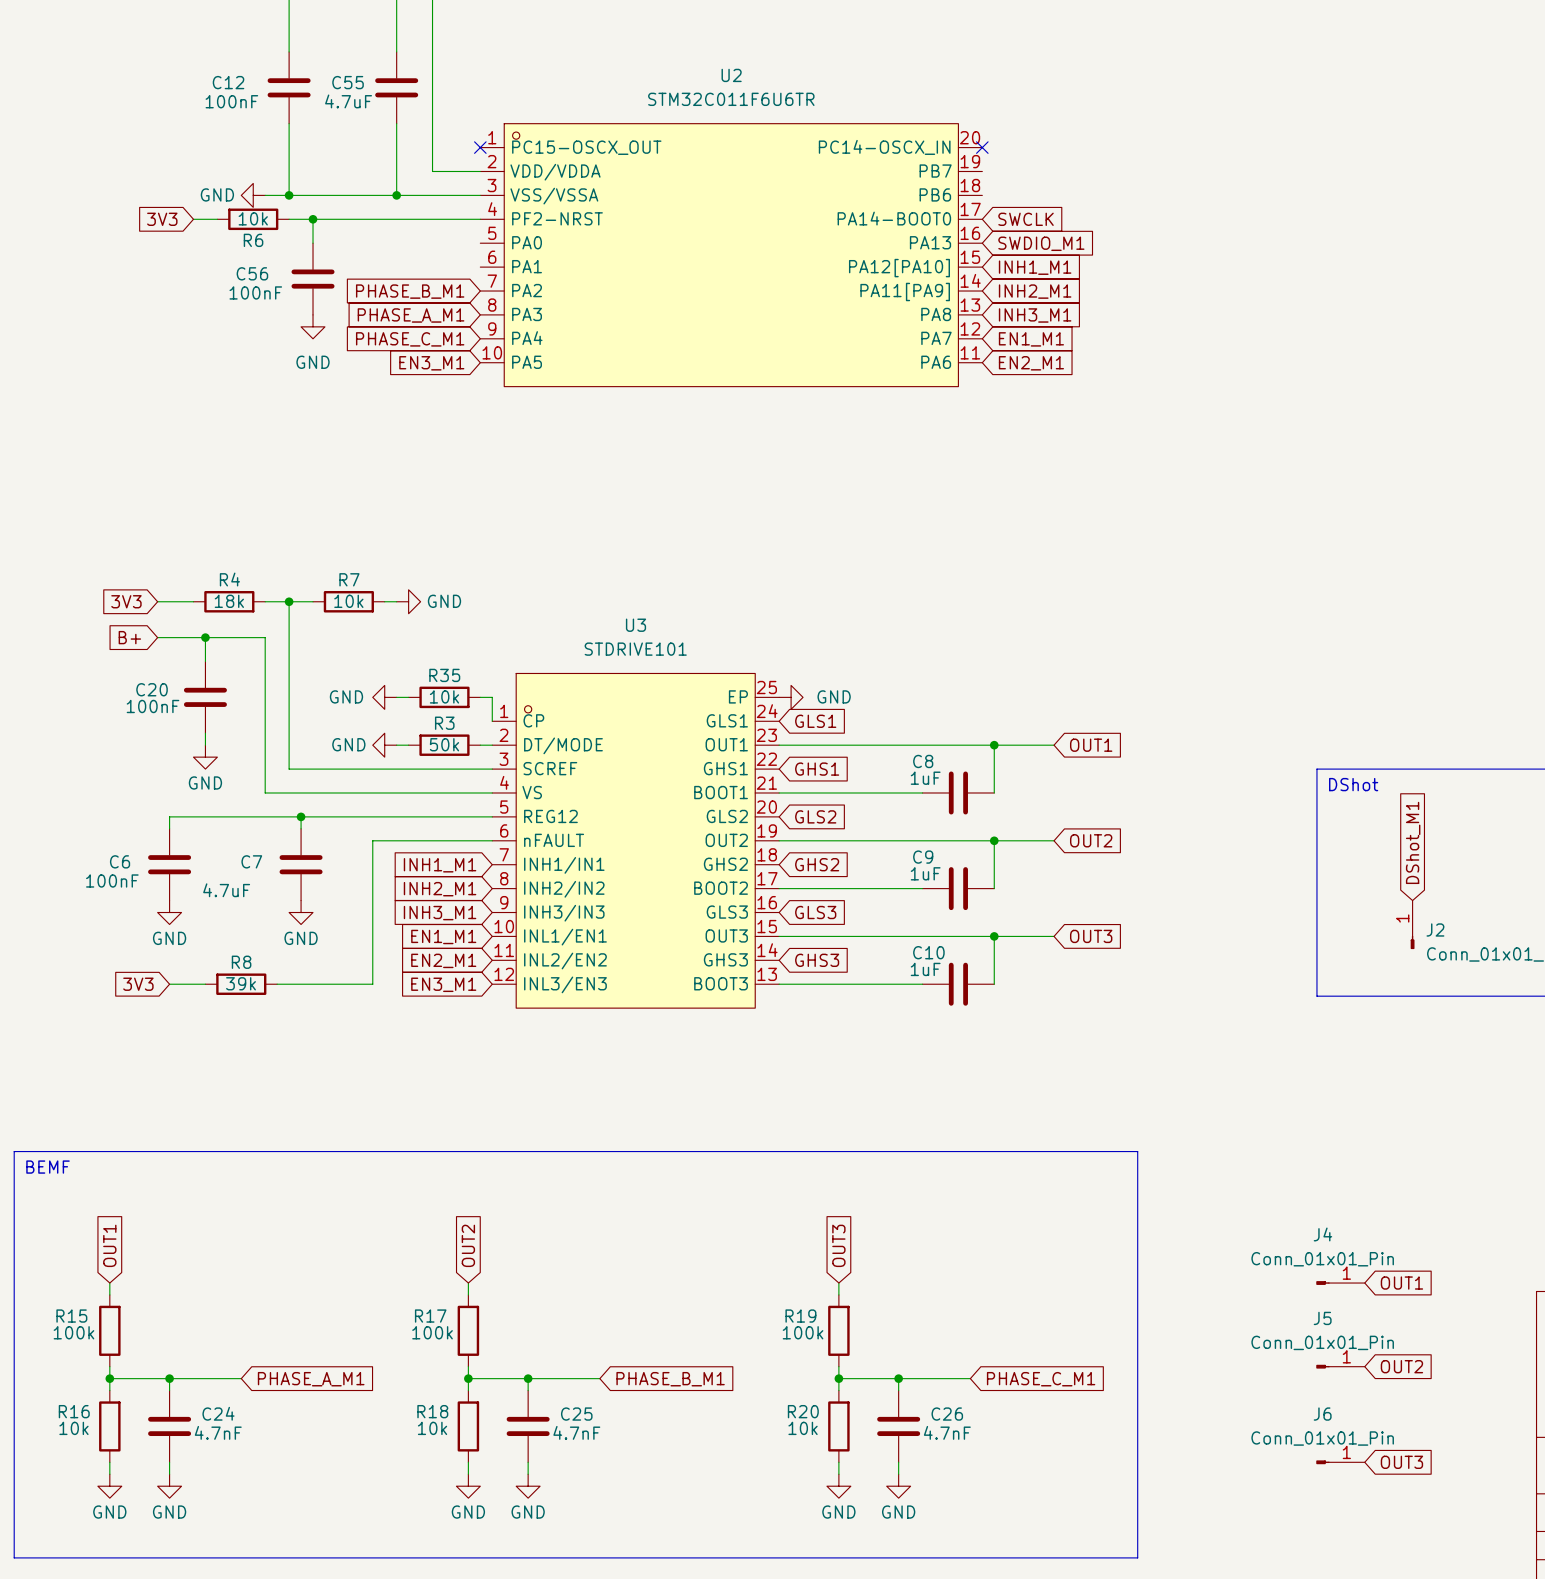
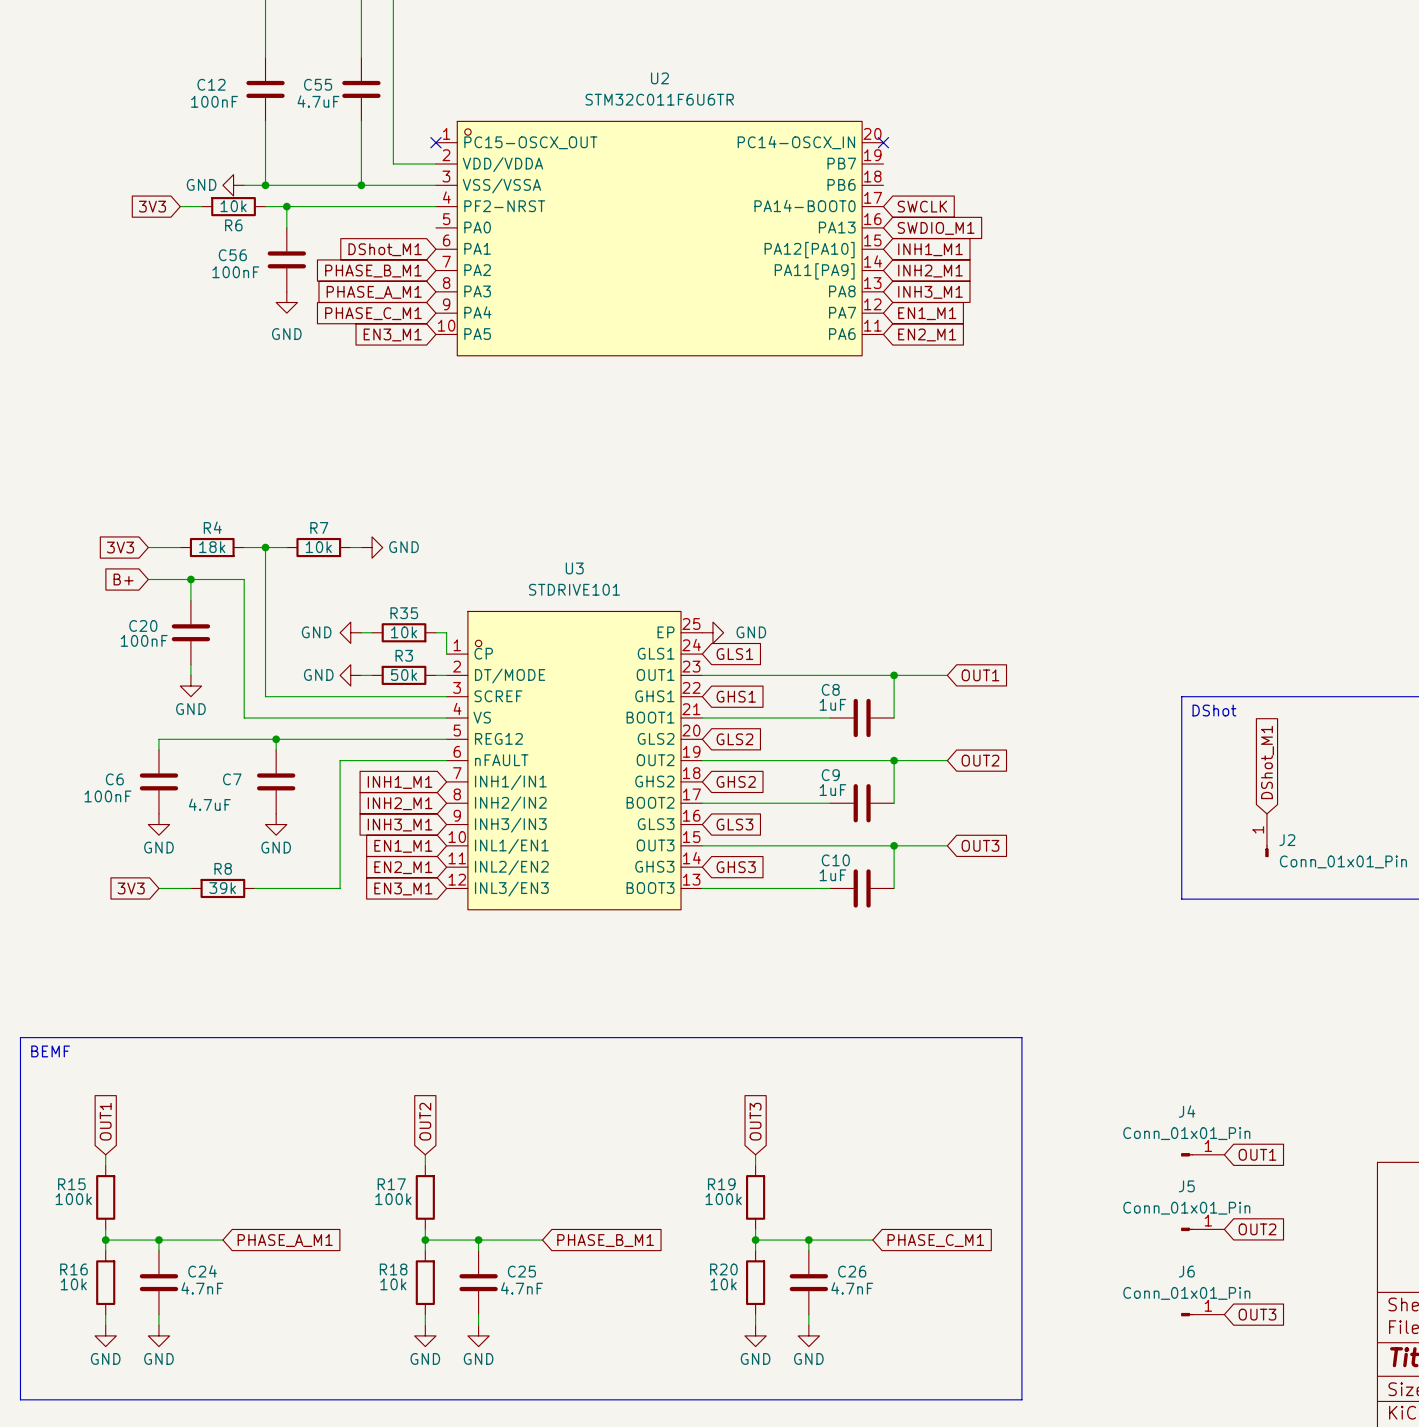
global label: none -> DShot_M1 (385, 249)

